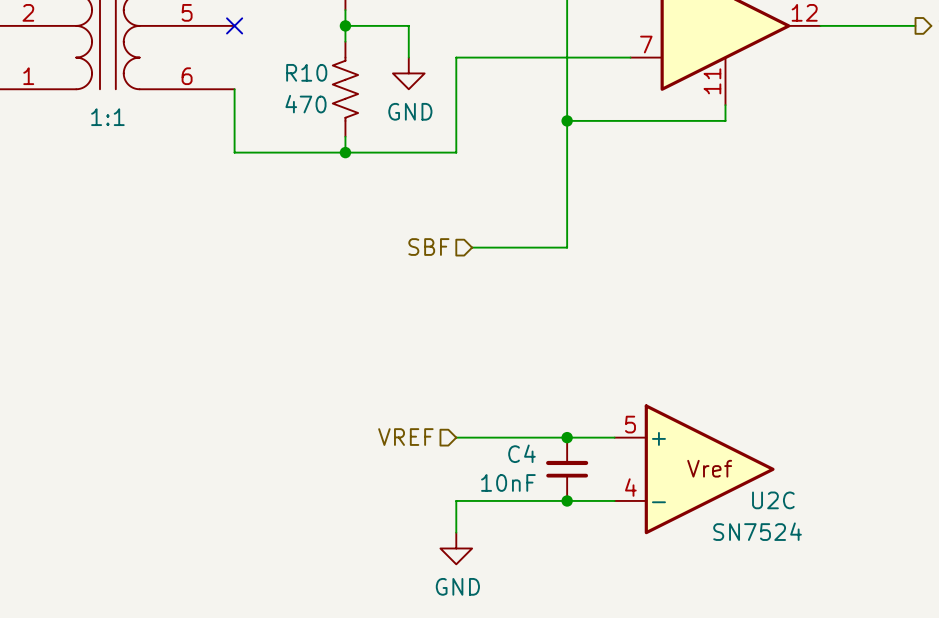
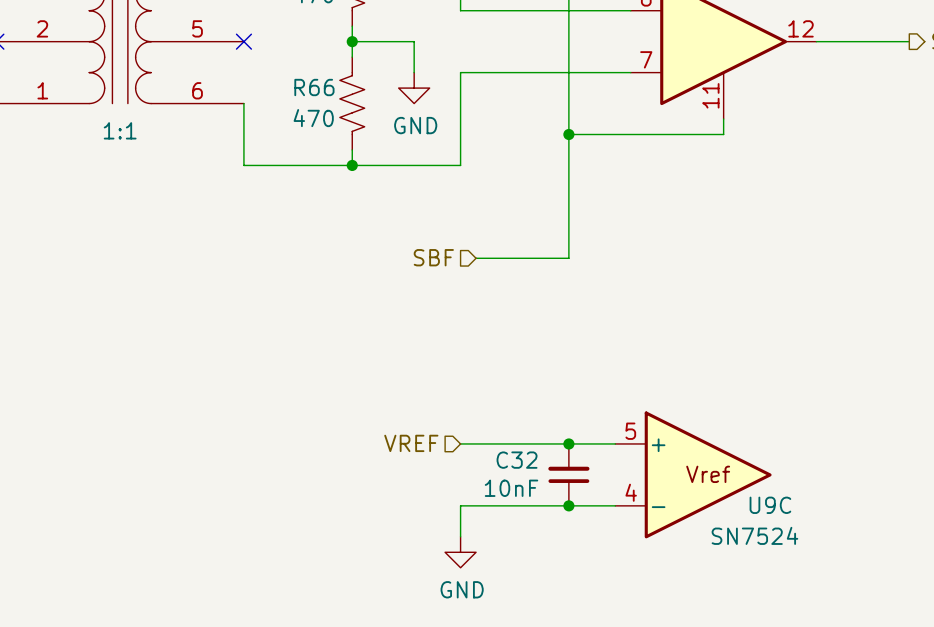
R10 name: R10 (306, 72) -> R66 (314, 87)
C4 name: C4 (521, 453) -> C32 (517, 460)
U2C name: U2C (773, 500) -> U9C (770, 505)

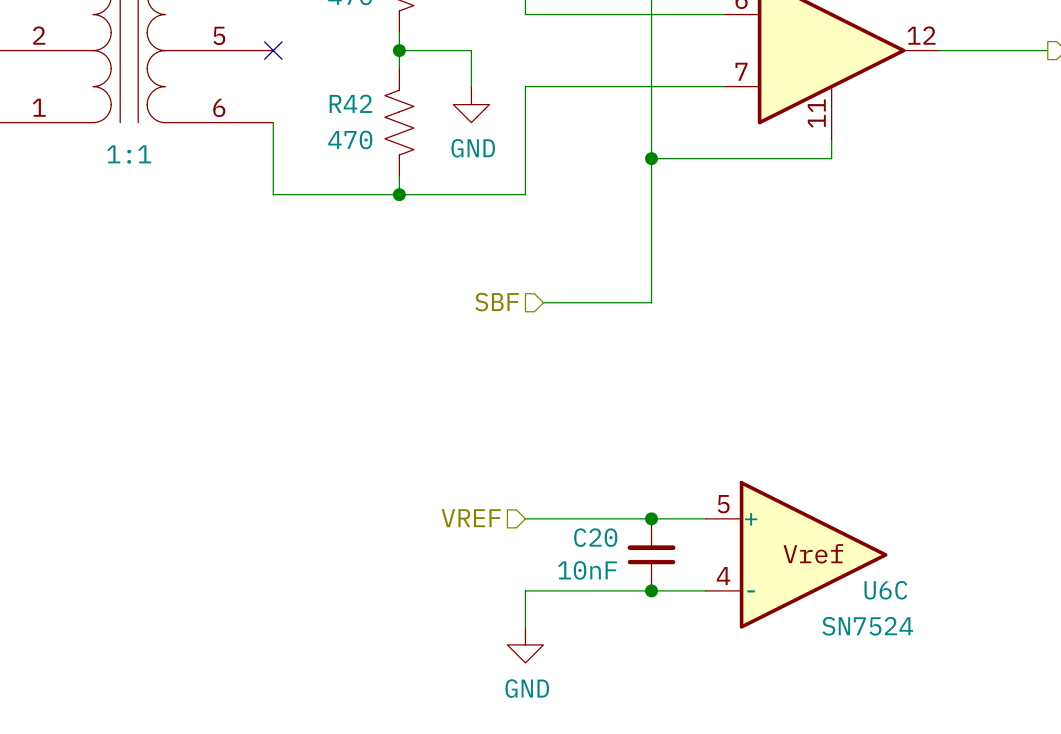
R66 name: R66 (314, 87) -> R42 (350, 103)
C32 name: C32 (517, 460) -> C20 (595, 537)
U9C name: U9C (770, 505) -> U6C (885, 590)

